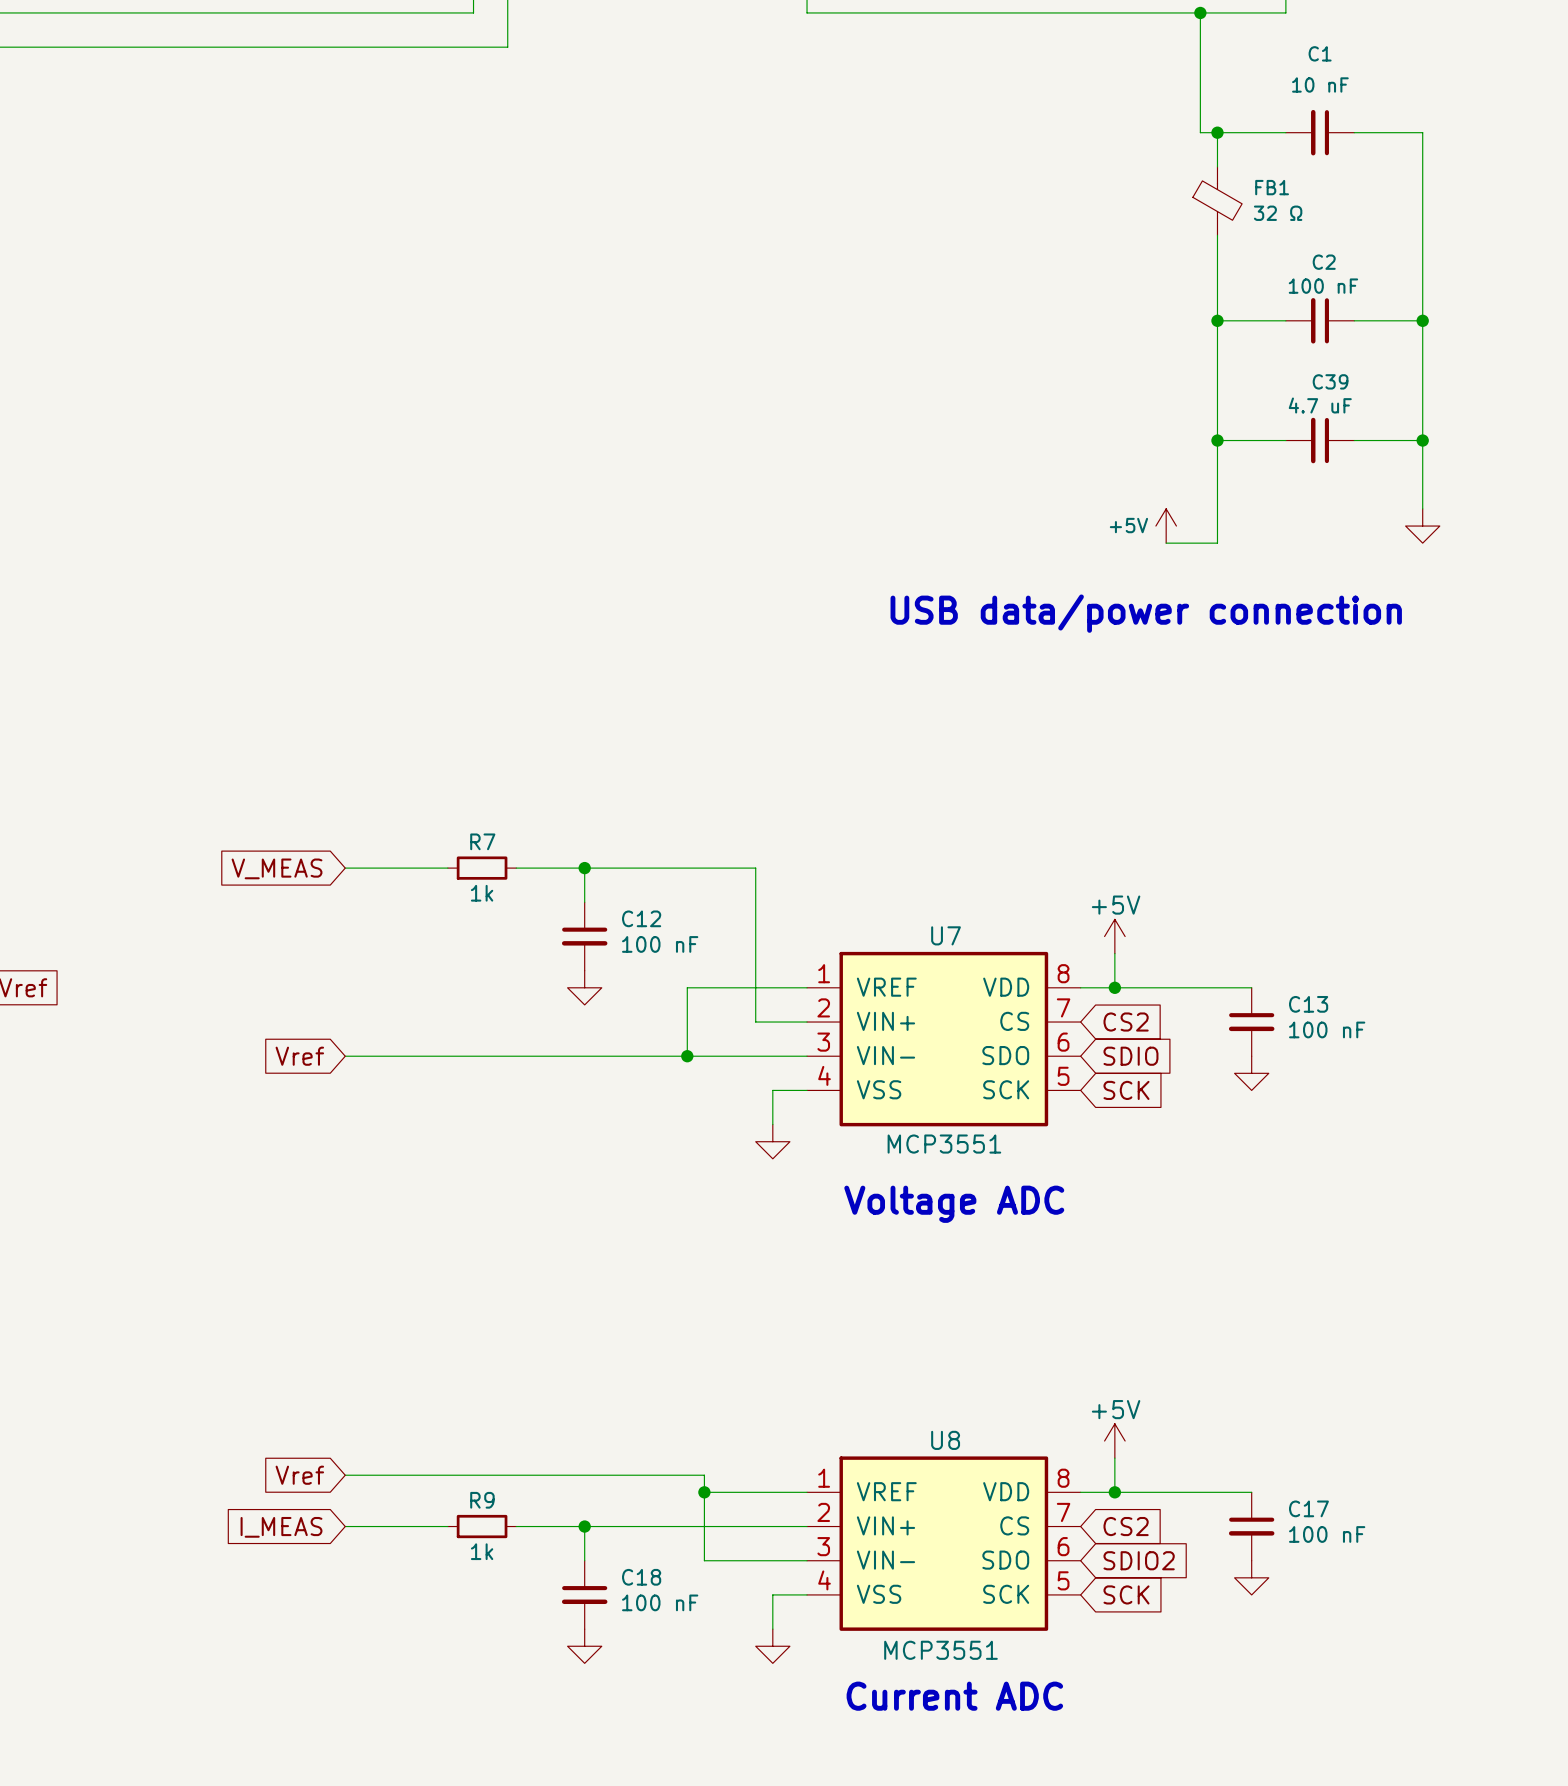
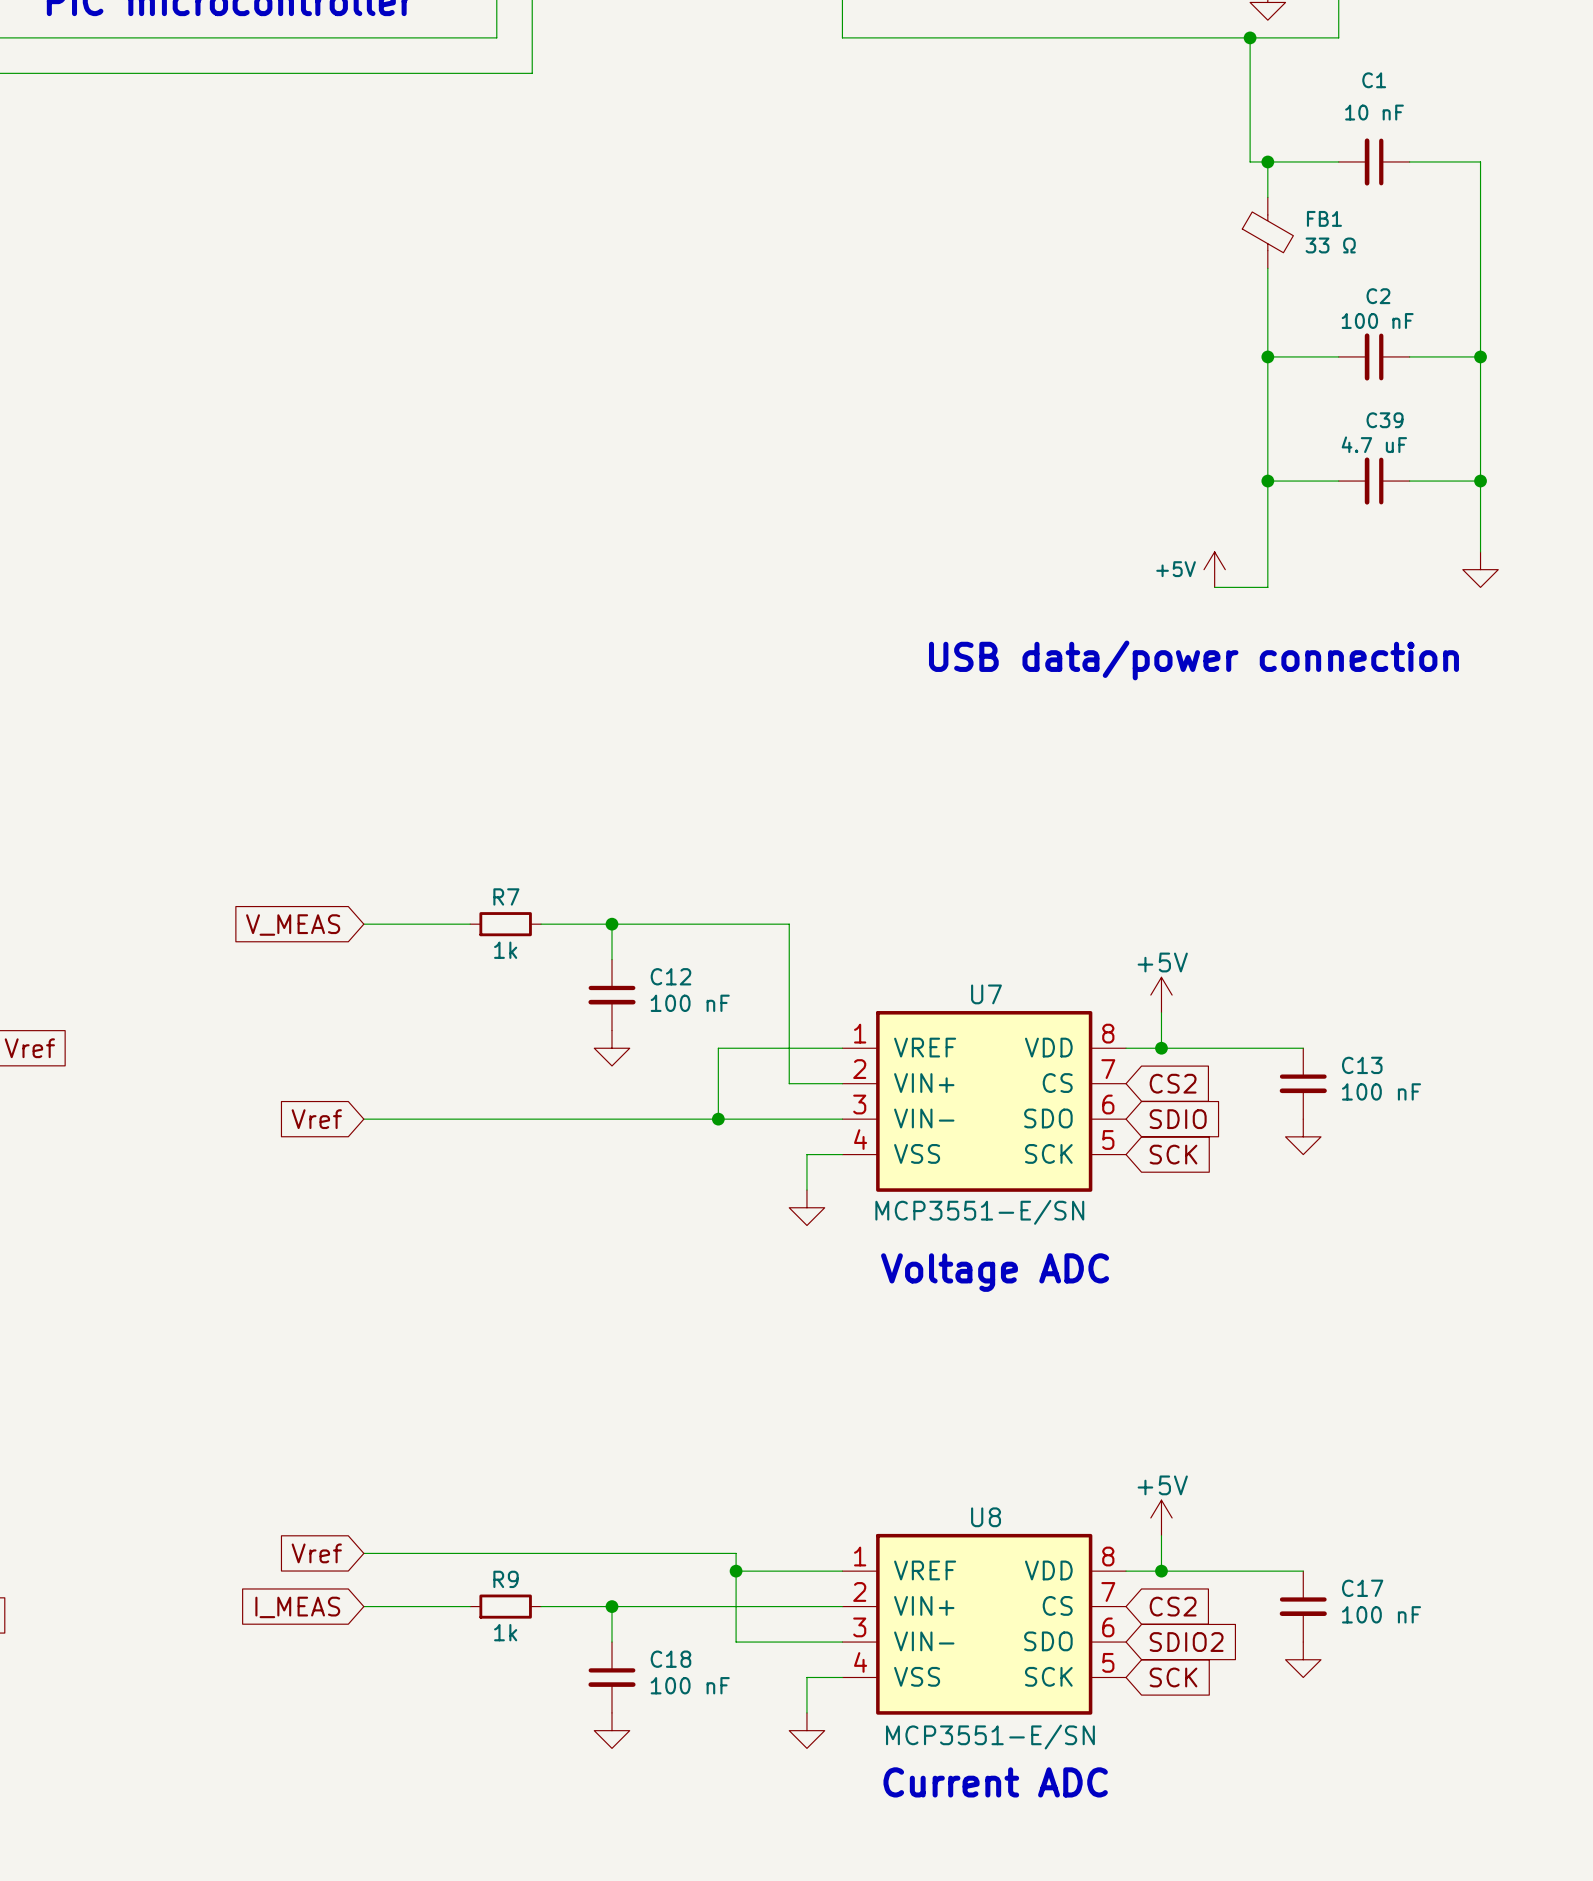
FB1 value: 32 Ω (1278, 213) -> 33 Ω (1330, 245)
U7 value: MCP3551 (944, 1144) -> MCP3551-E/SN (979, 1212)
U8 value: MCP3551 (940, 1650) -> MCP3551-E/SN (990, 1737)

